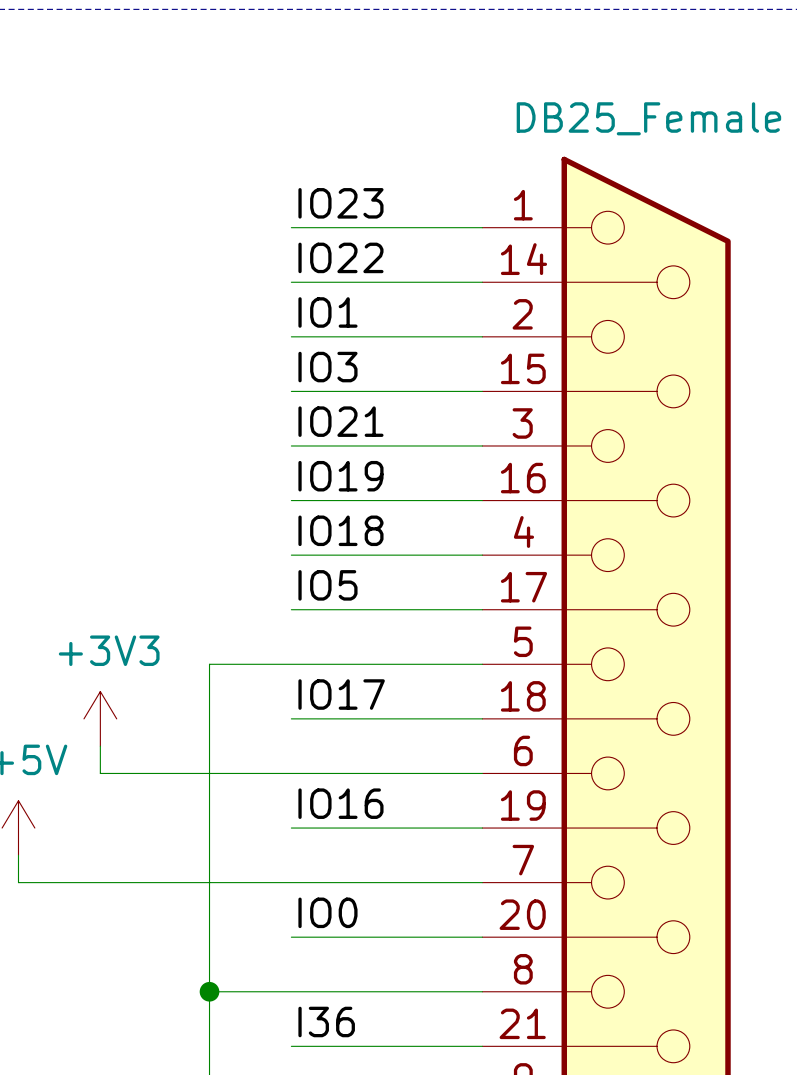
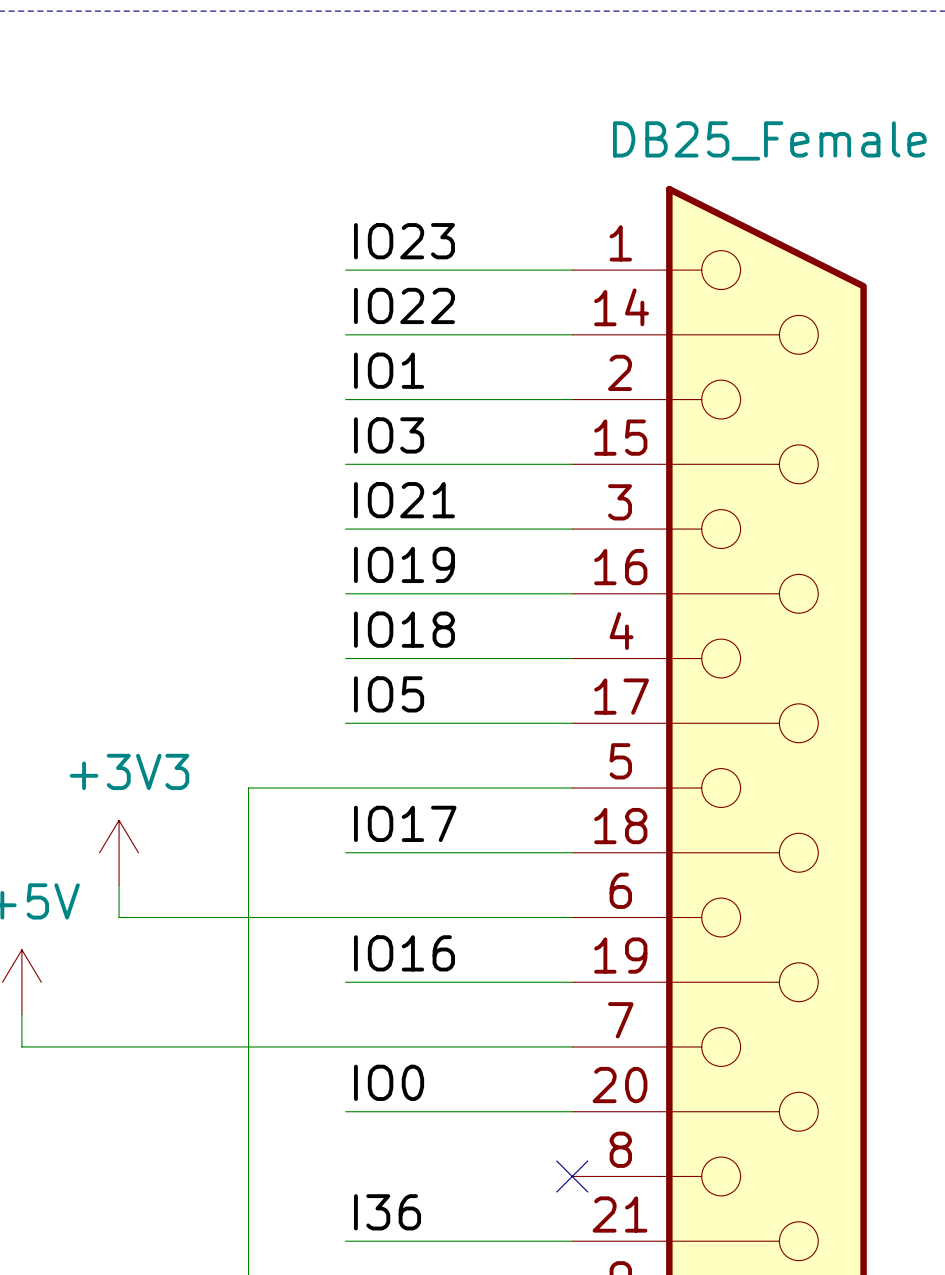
wire: (209, 991) (482, 991) -> none
junction: (209, 991) -> none
no-connect mark: none -> (572, 1176)

